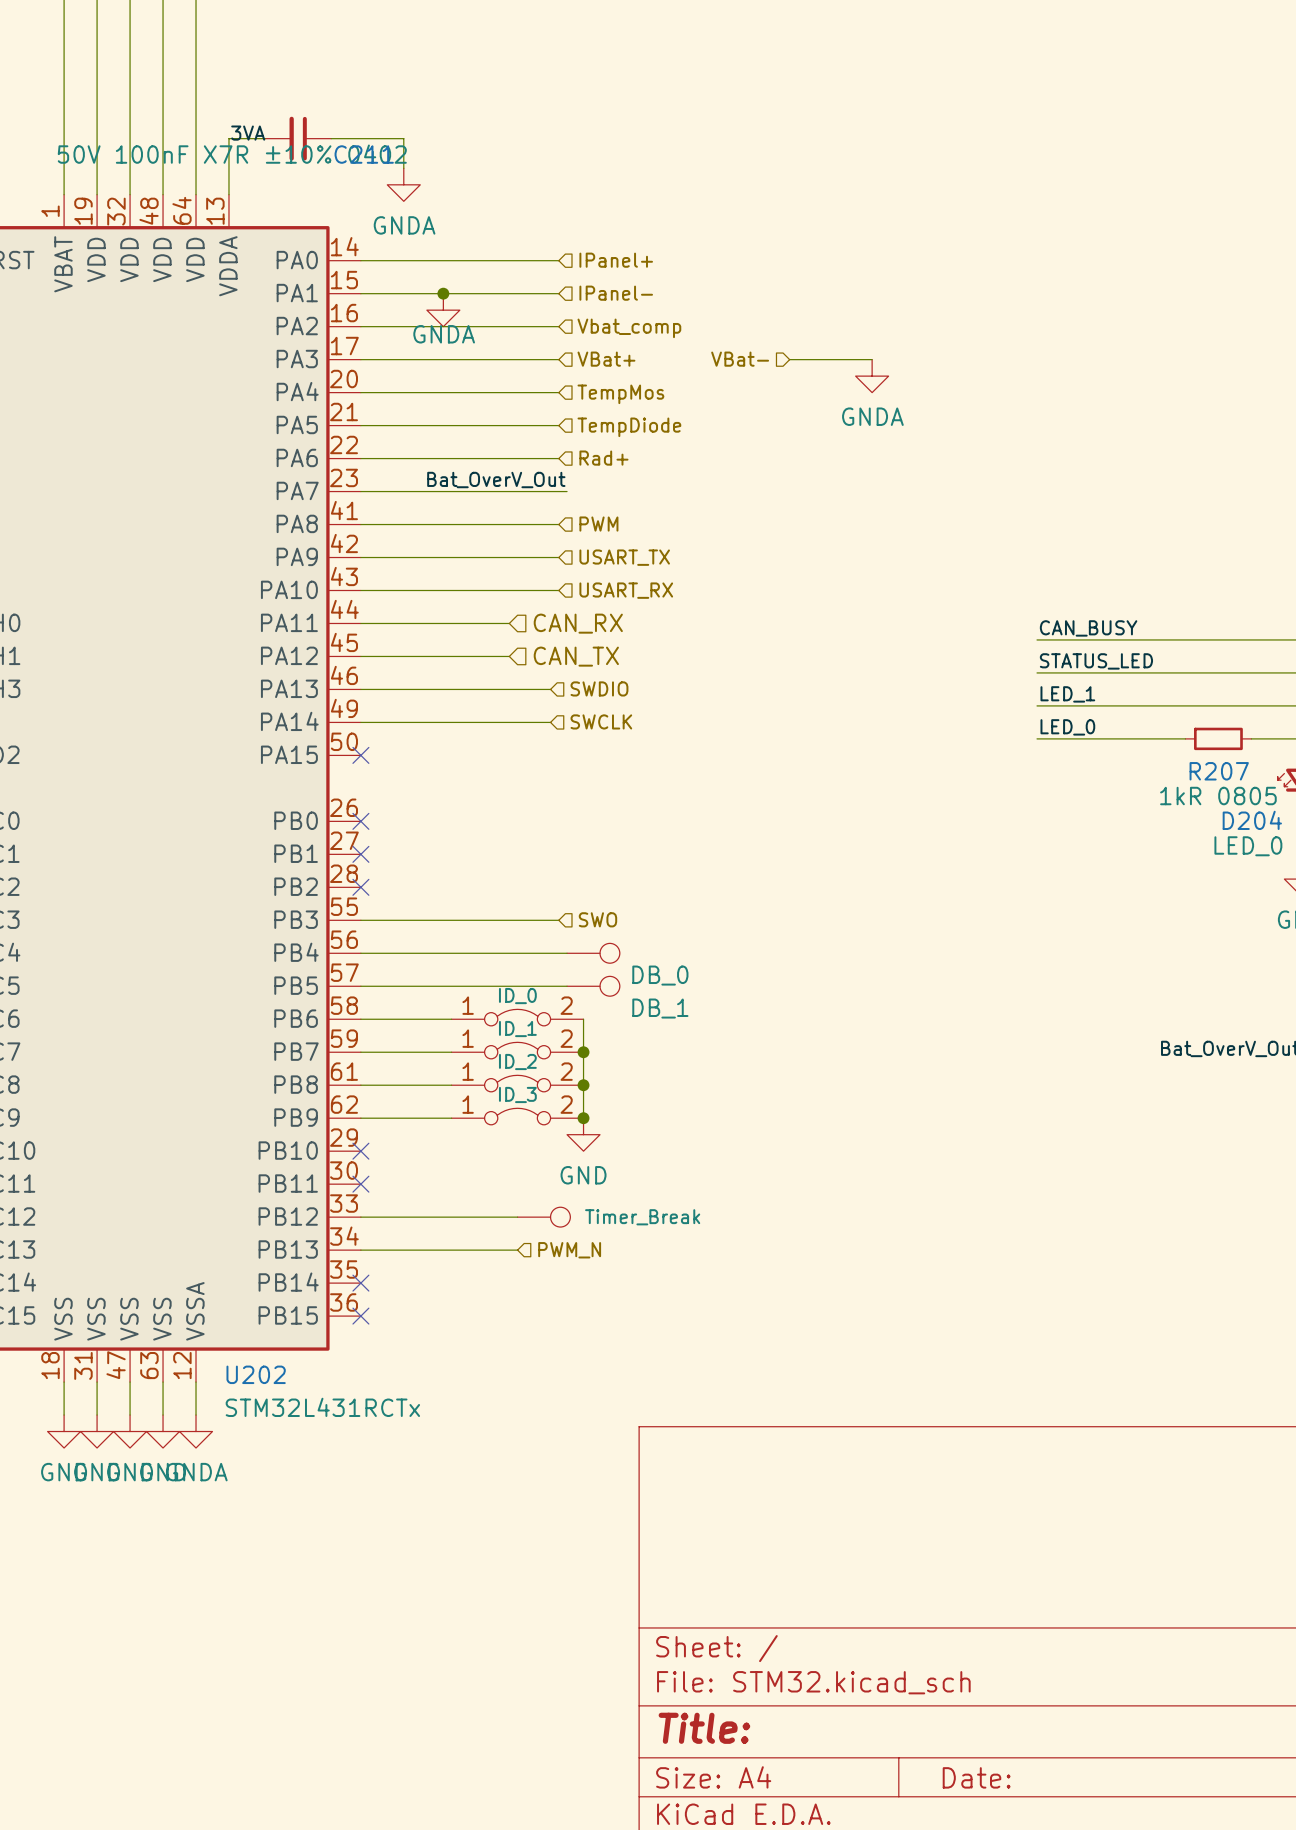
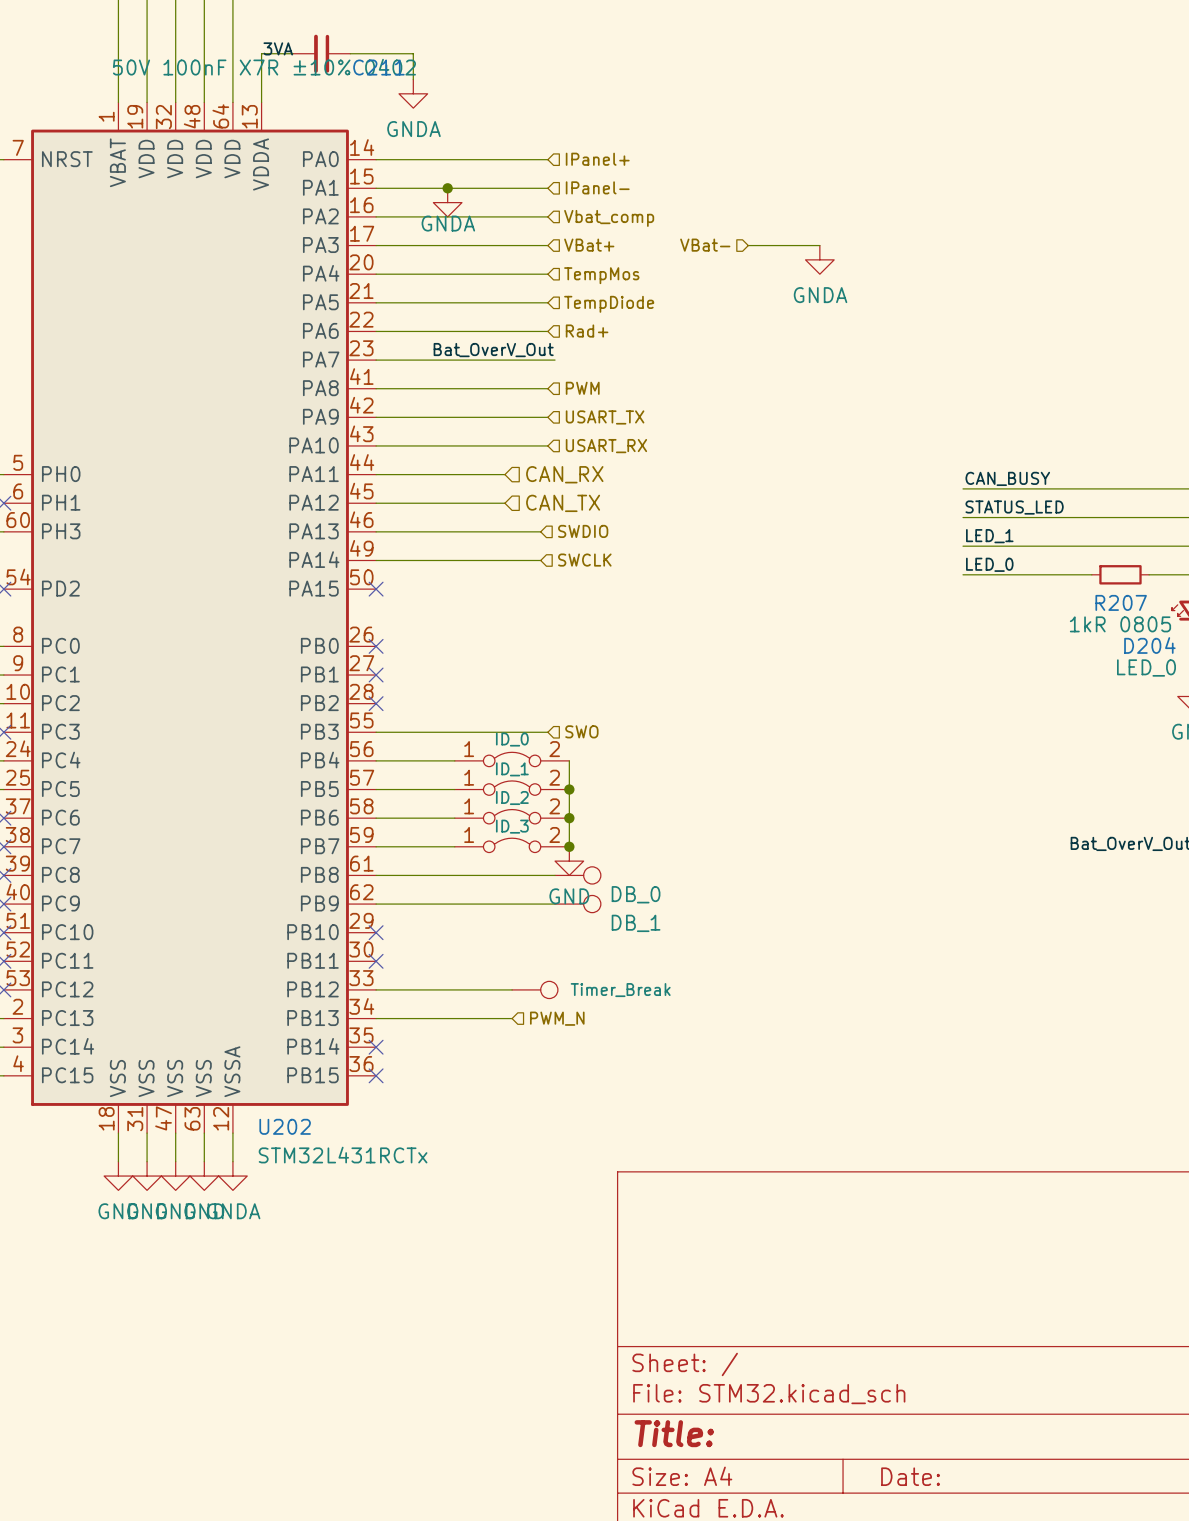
part: none -> ID_0 (512, 759)
wire: (451, 953) (567, 953) -> (454, 875) (555, 875)
part position: (593, 953) -> (577, 875)
part: none -> ID_1 (512, 788)
wire: (451, 986) (567, 986) -> (454, 904) (555, 904)
junction: none -> (569, 789)
part position: (593, 986) -> (577, 904)
part value: ID_0 (517, 996) -> ID_2 (512, 798)
junction: none -> (569, 818)
part value: ID_1 (517, 1029) -> ID_3 (512, 826)
wire: (583, 1052) (583, 1118) -> (569, 760) (569, 818)
part: ID_2 (517, 1083) -> none
junction: (583, 1085) -> none
part: ID_3 (517, 1116) -> none
junction: (583, 1118) -> none
power symbol position: GND (583, 1134) -> GND (569, 861)

